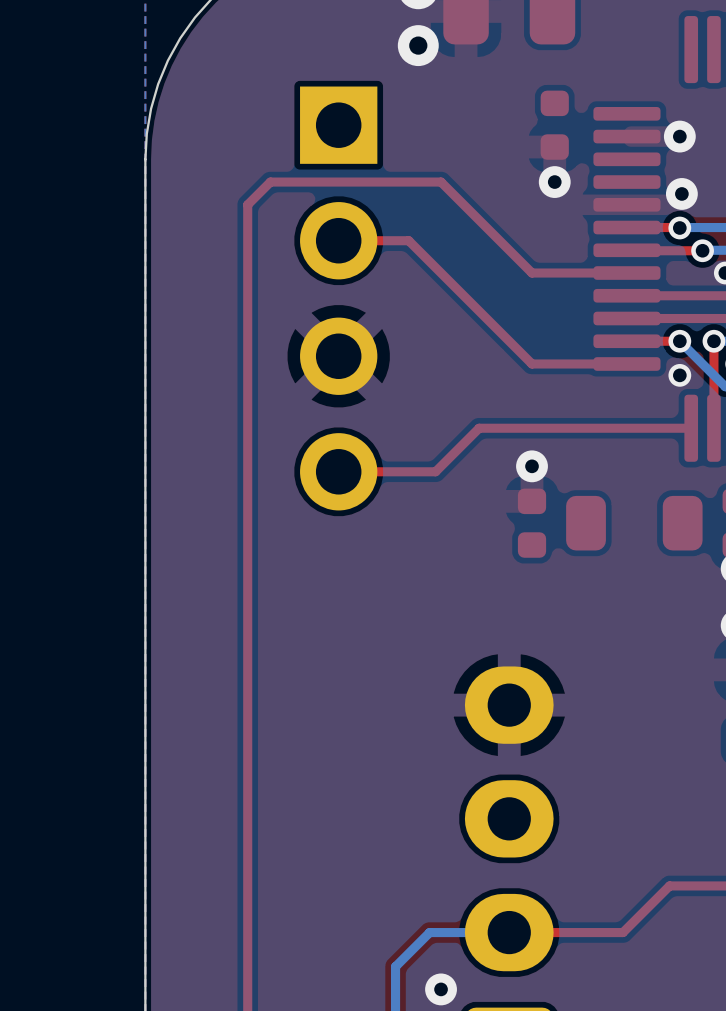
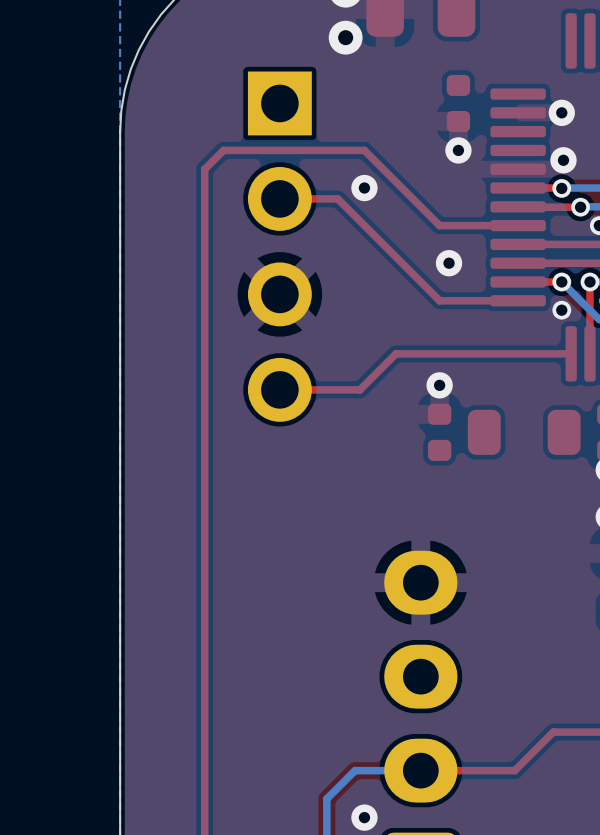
via: none -> (364, 188)
via: none -> (449, 263)

